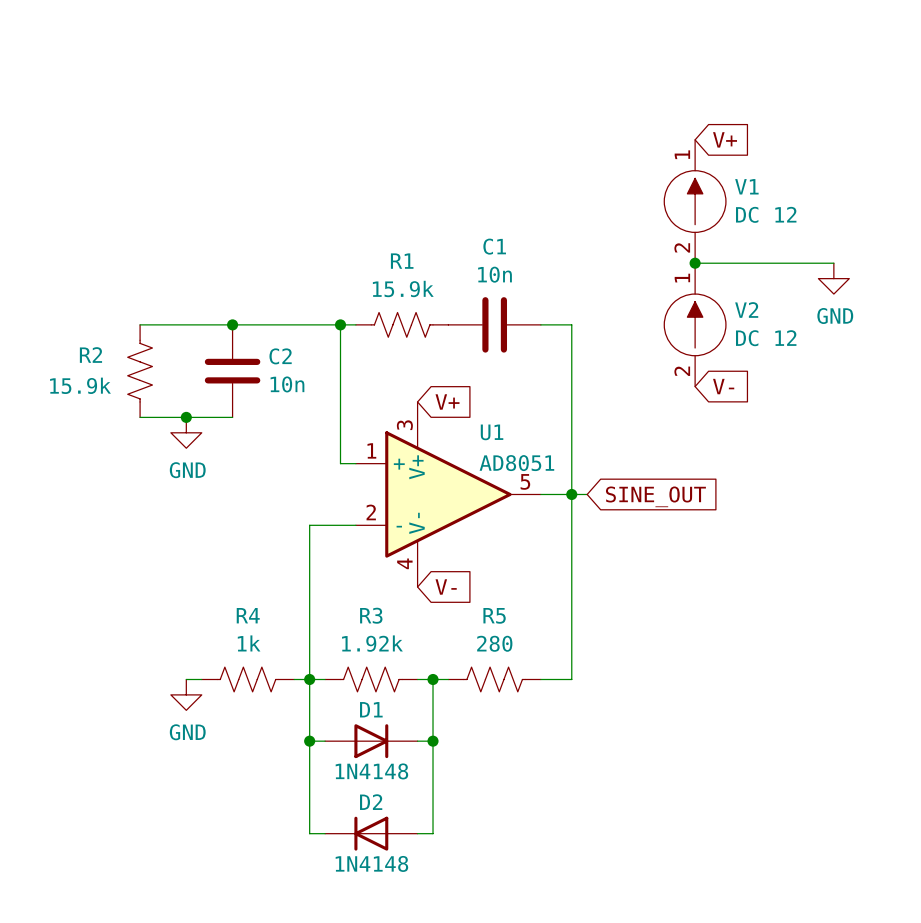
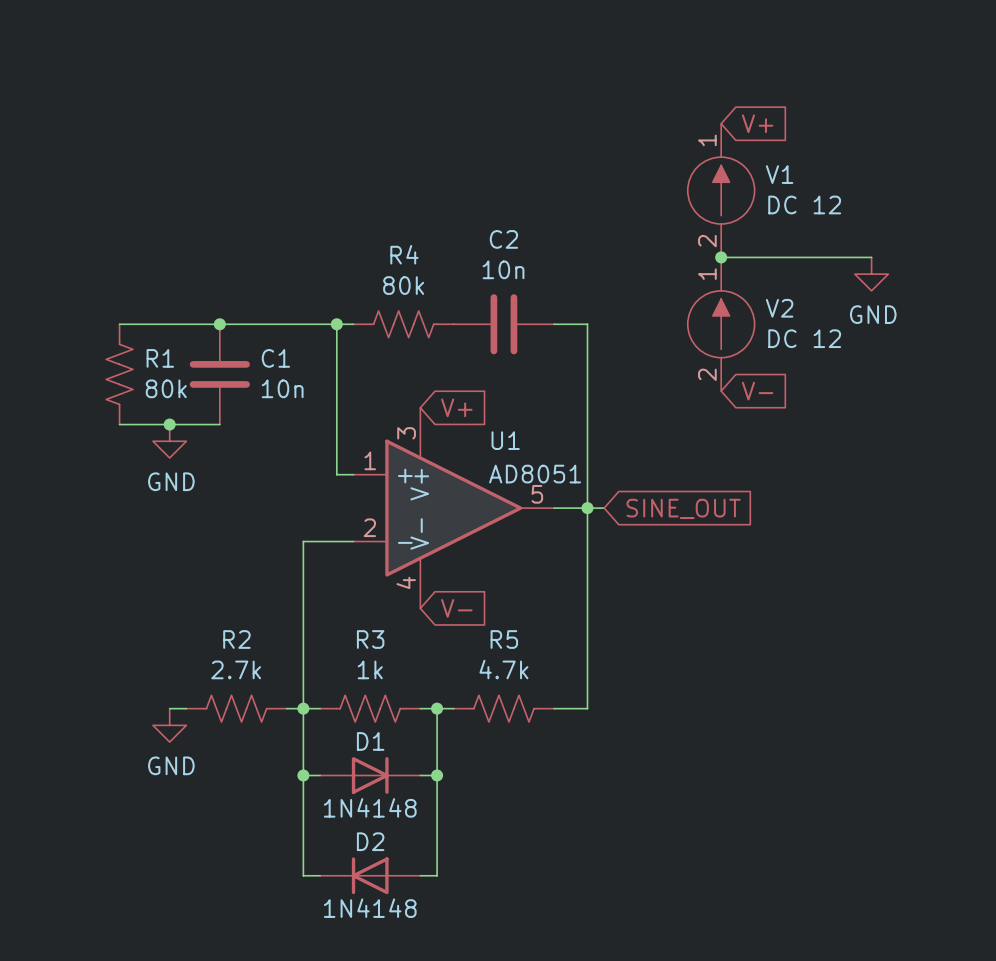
C1 name: C1 (494, 246) -> C2 (503, 239)
R1 name: R1 (402, 261) -> R4 (404, 254)
R1 value: 15.9k (403, 288) -> 80k (403, 285)
R2 name: R2 (90, 355) -> R1 (160, 358)
C2 name: C2 (280, 356) -> C1 (275, 358)
R2 value: 15.9k (80, 385) -> 80k (166, 388)
R4 name: R4 (248, 615) -> R2 (236, 639)
R4 value: 1k (249, 643) -> 2.7k (236, 669)
R3 value: 1.92k (372, 643) -> 1k (370, 669)
R5 value: 280 (494, 643) -> 4.7k (503, 669)

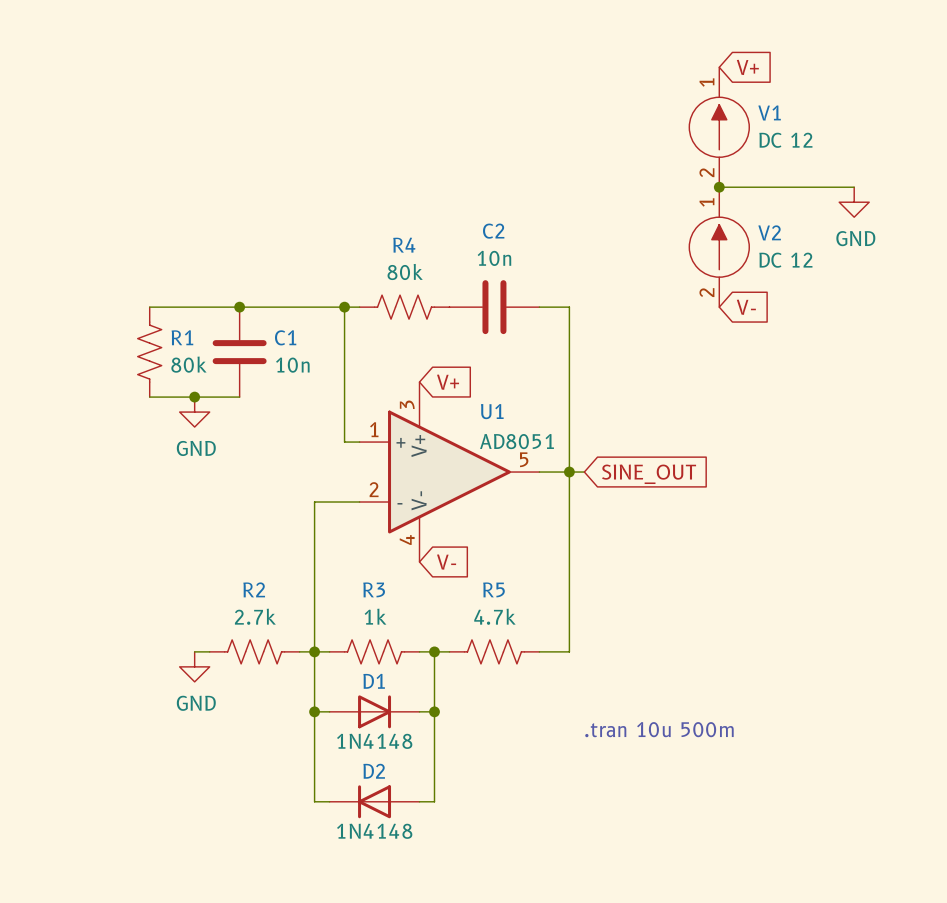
global label position: V+ (757, 123) -> V+ (747, 67)
V1 position: (721, 190) -> (719, 127)
wire: (721, 257) (871, 257) -> (719, 187) (854, 187)
junction position: (721, 257) -> (719, 187)
power symbol position: GND (871, 274) -> GND (854, 202)
V2 position: (721, 324) -> (719, 247)
global label position: V- (757, 391) -> V- (746, 307)
text: none -> .tran 10u 500m (659, 729)

